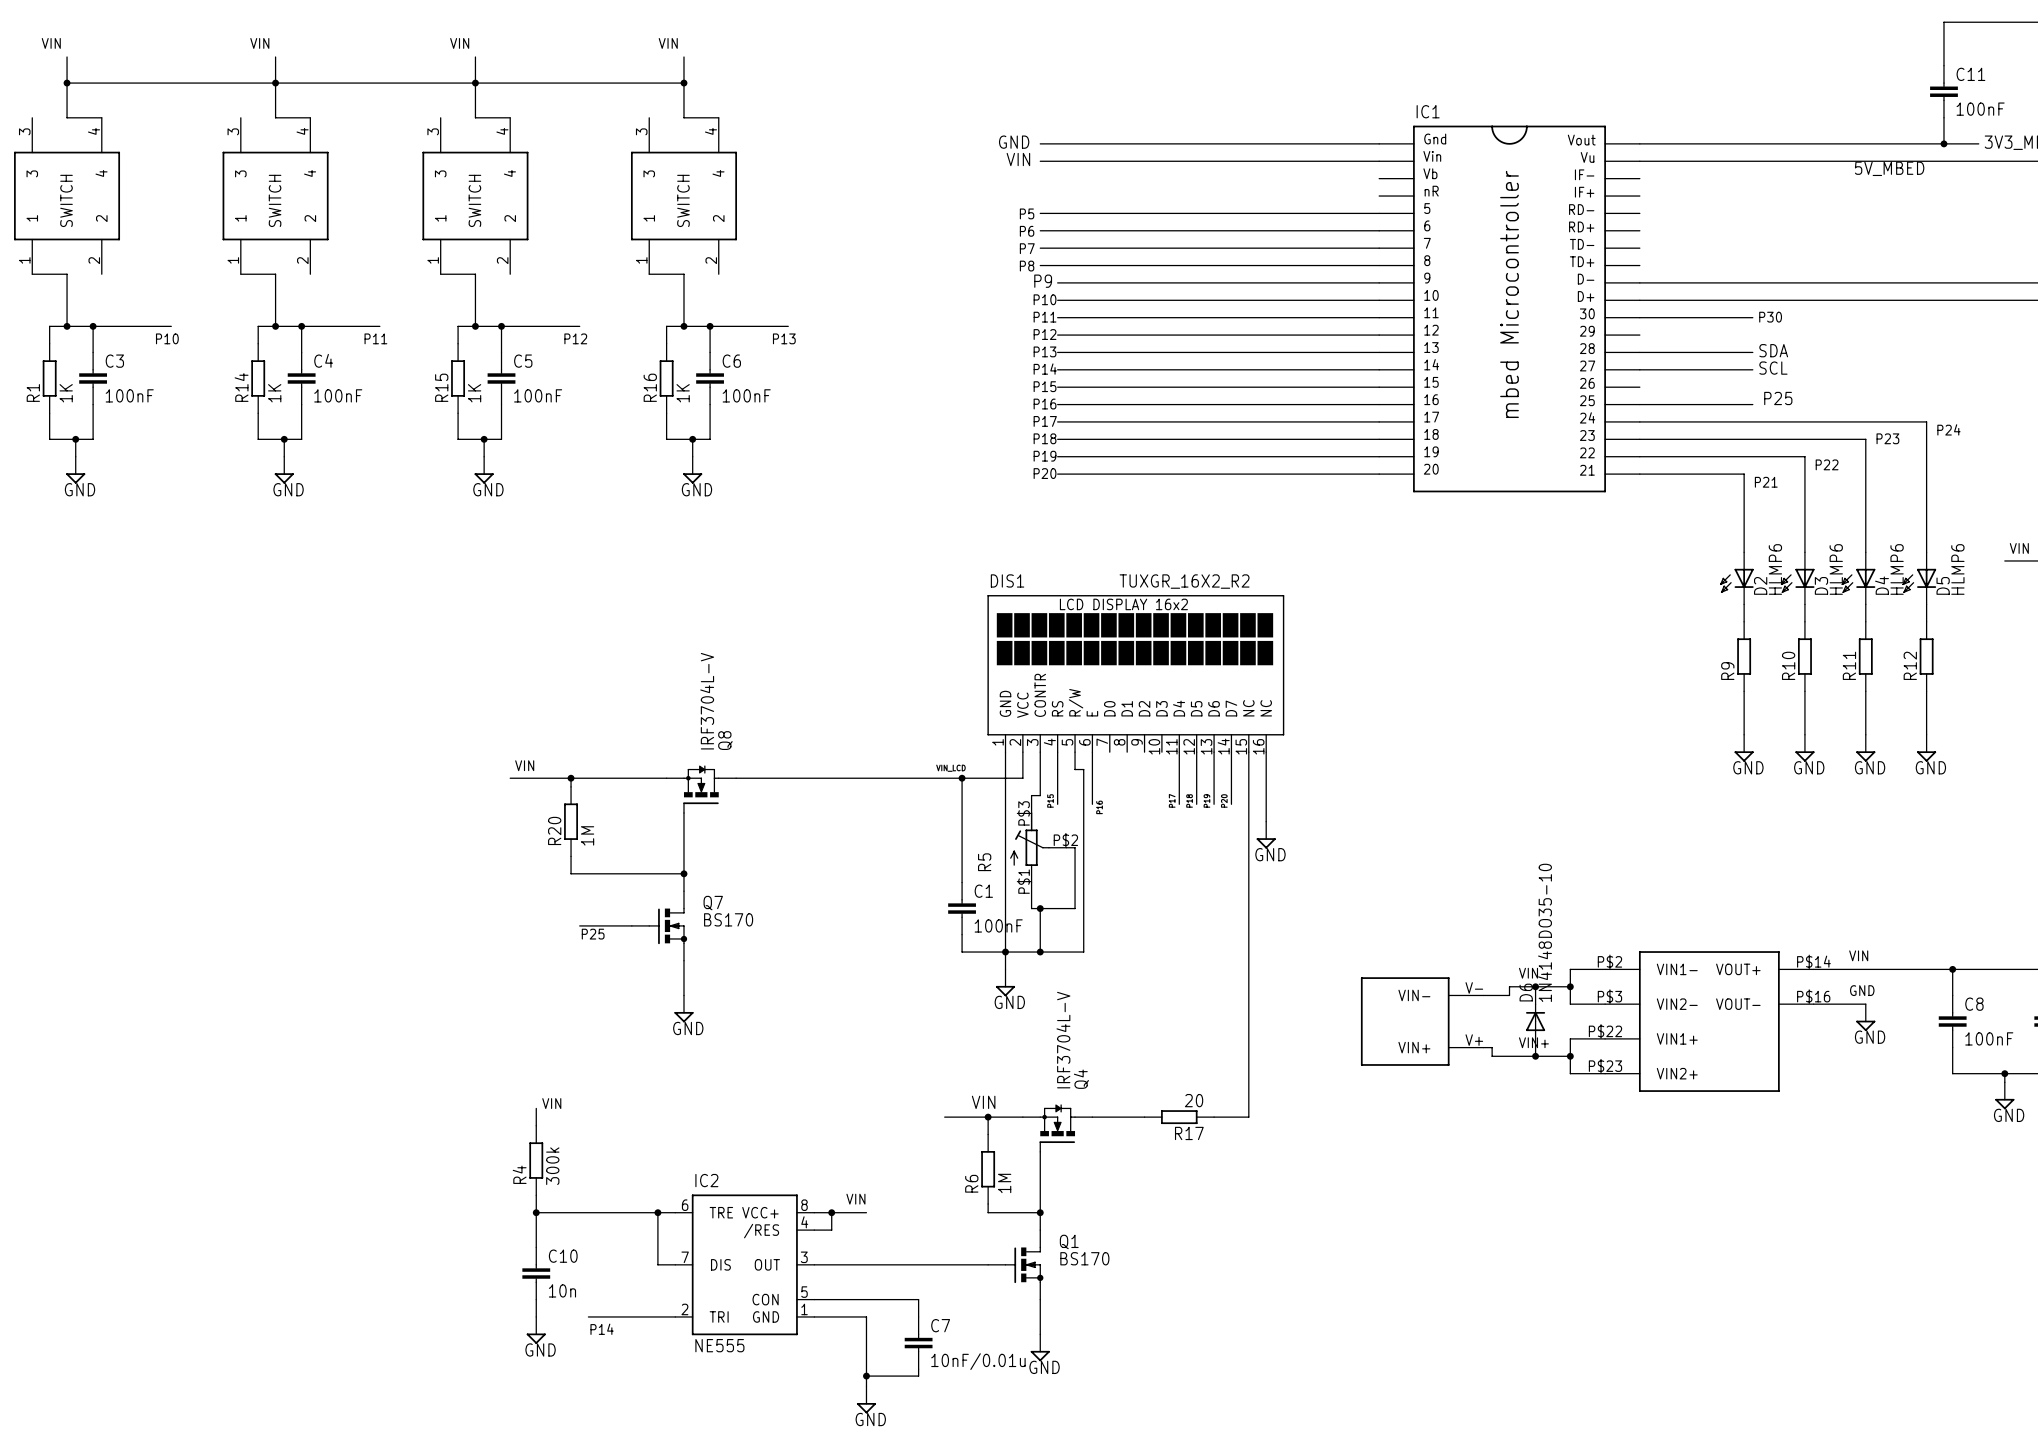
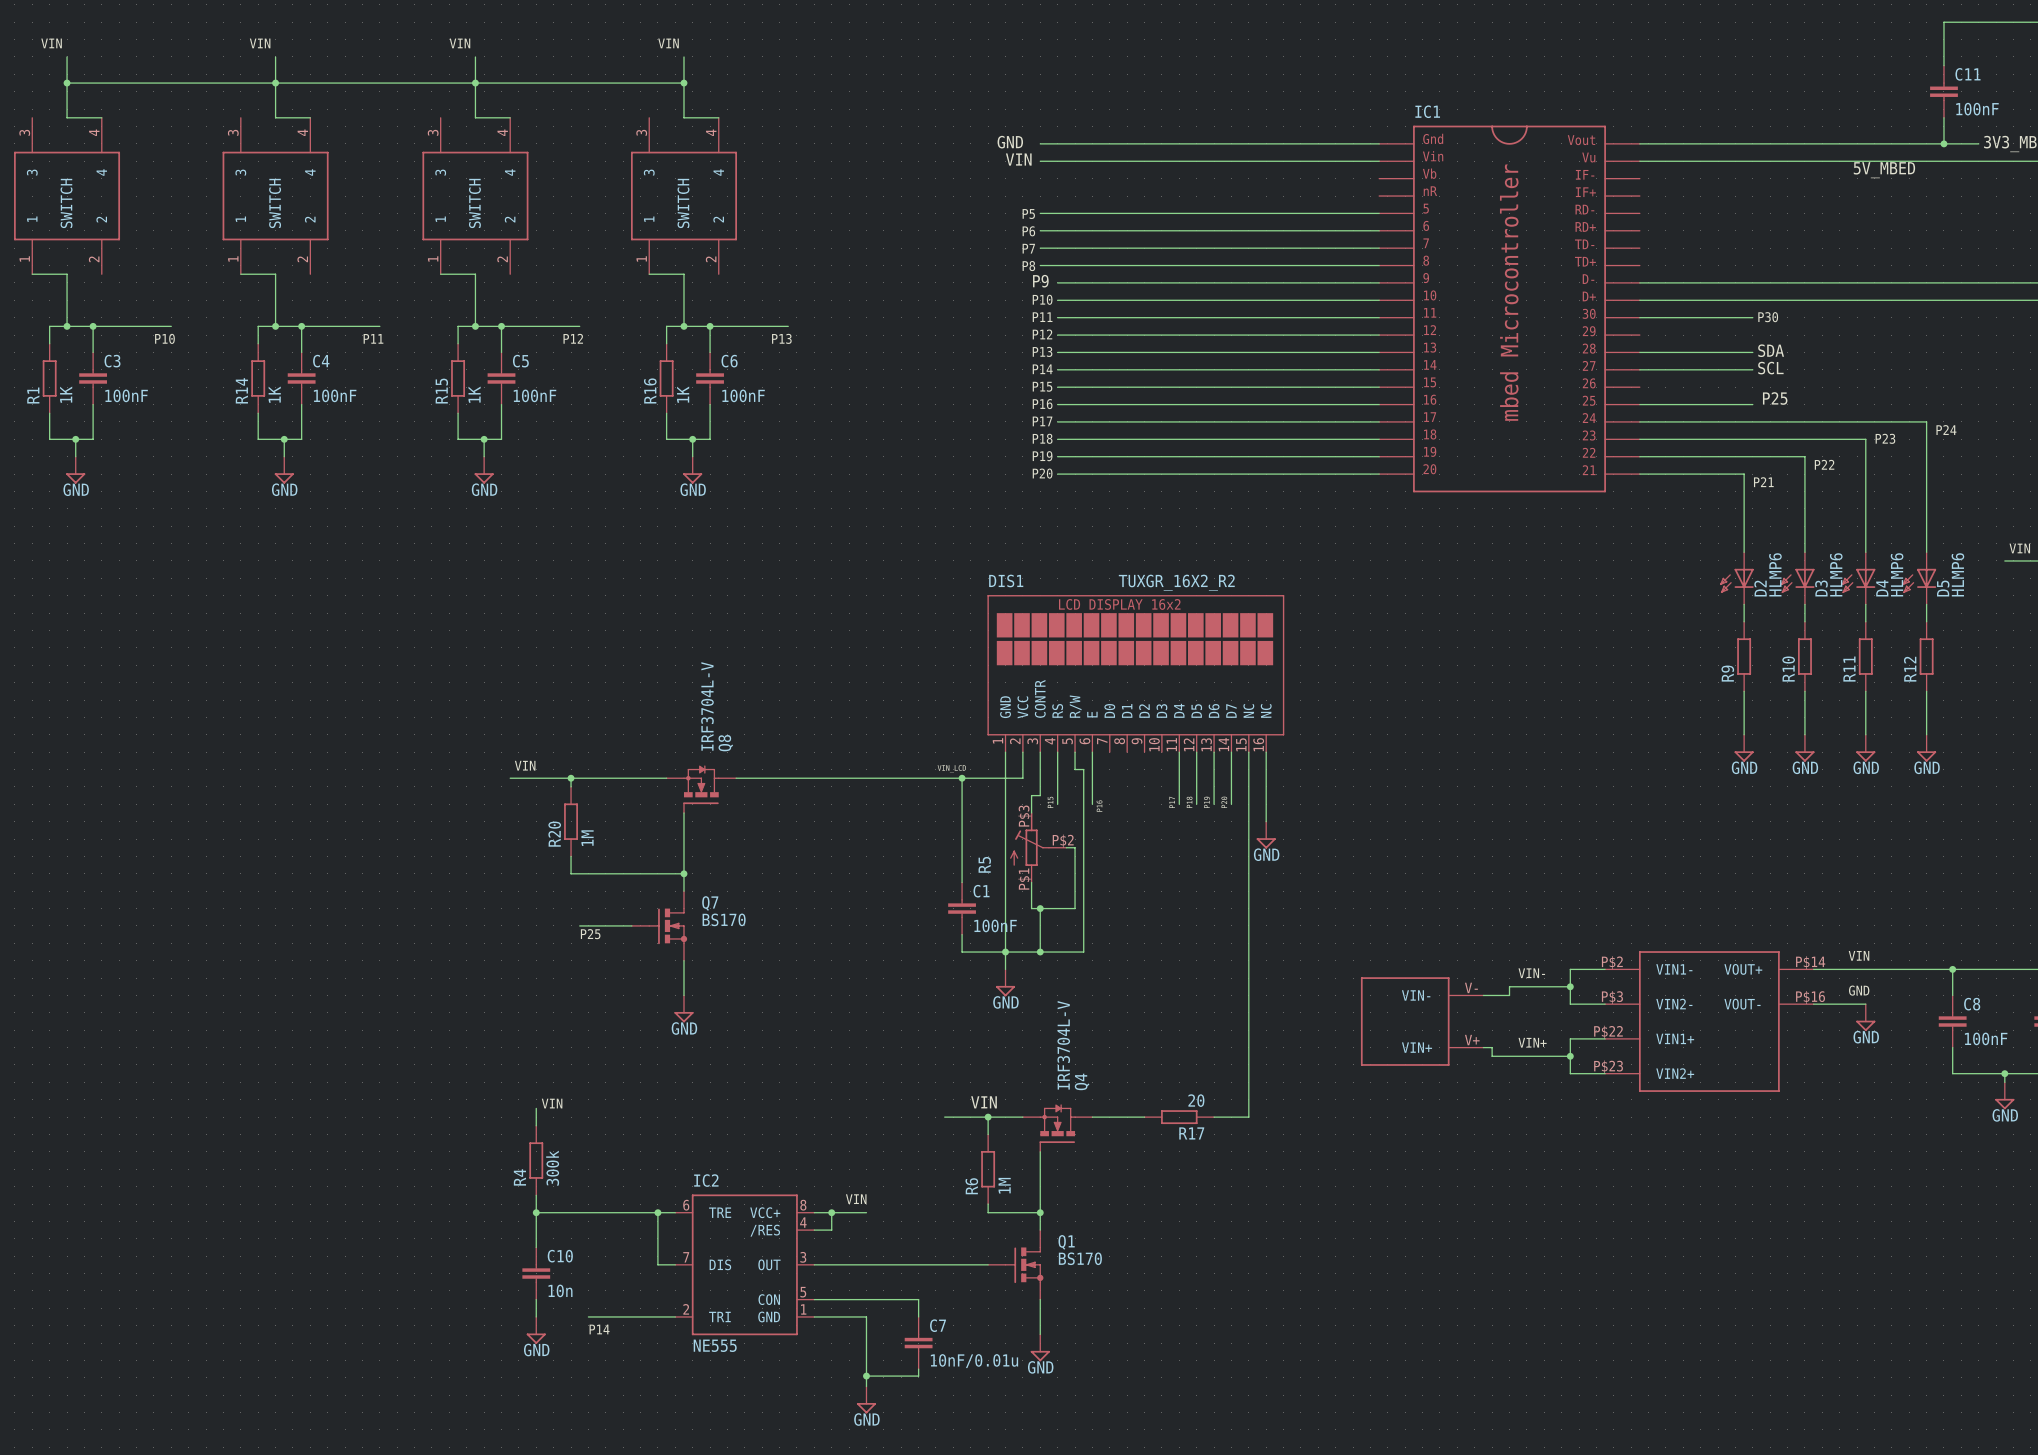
wire: (1535, 986) (1535, 1004) -> none
junction: (1535, 986) -> none
D6: 1N4148DO35-10 (1535, 1021) -> none
wire: (1535, 1038) (1535, 1056) -> none
junction: (1535, 1056) -> none

